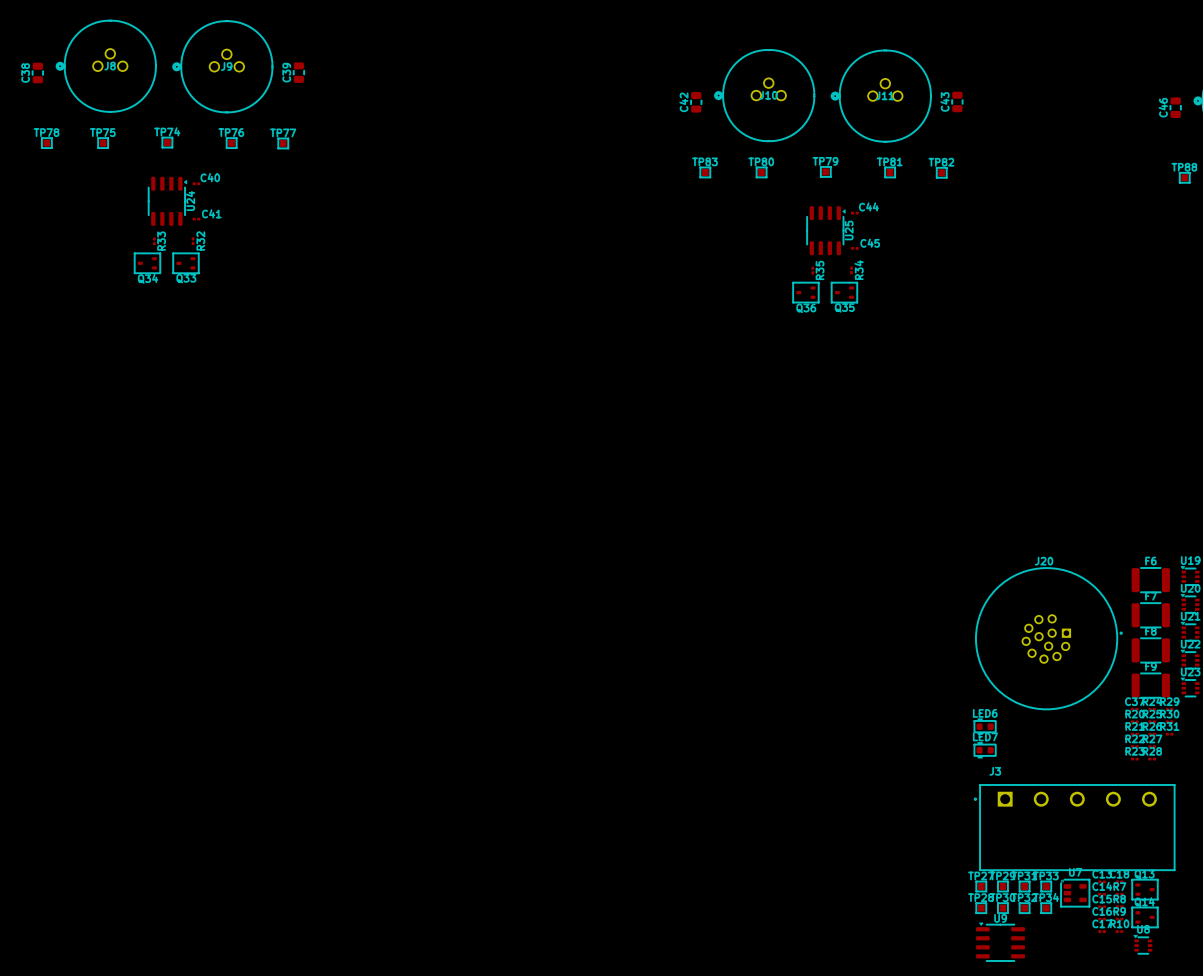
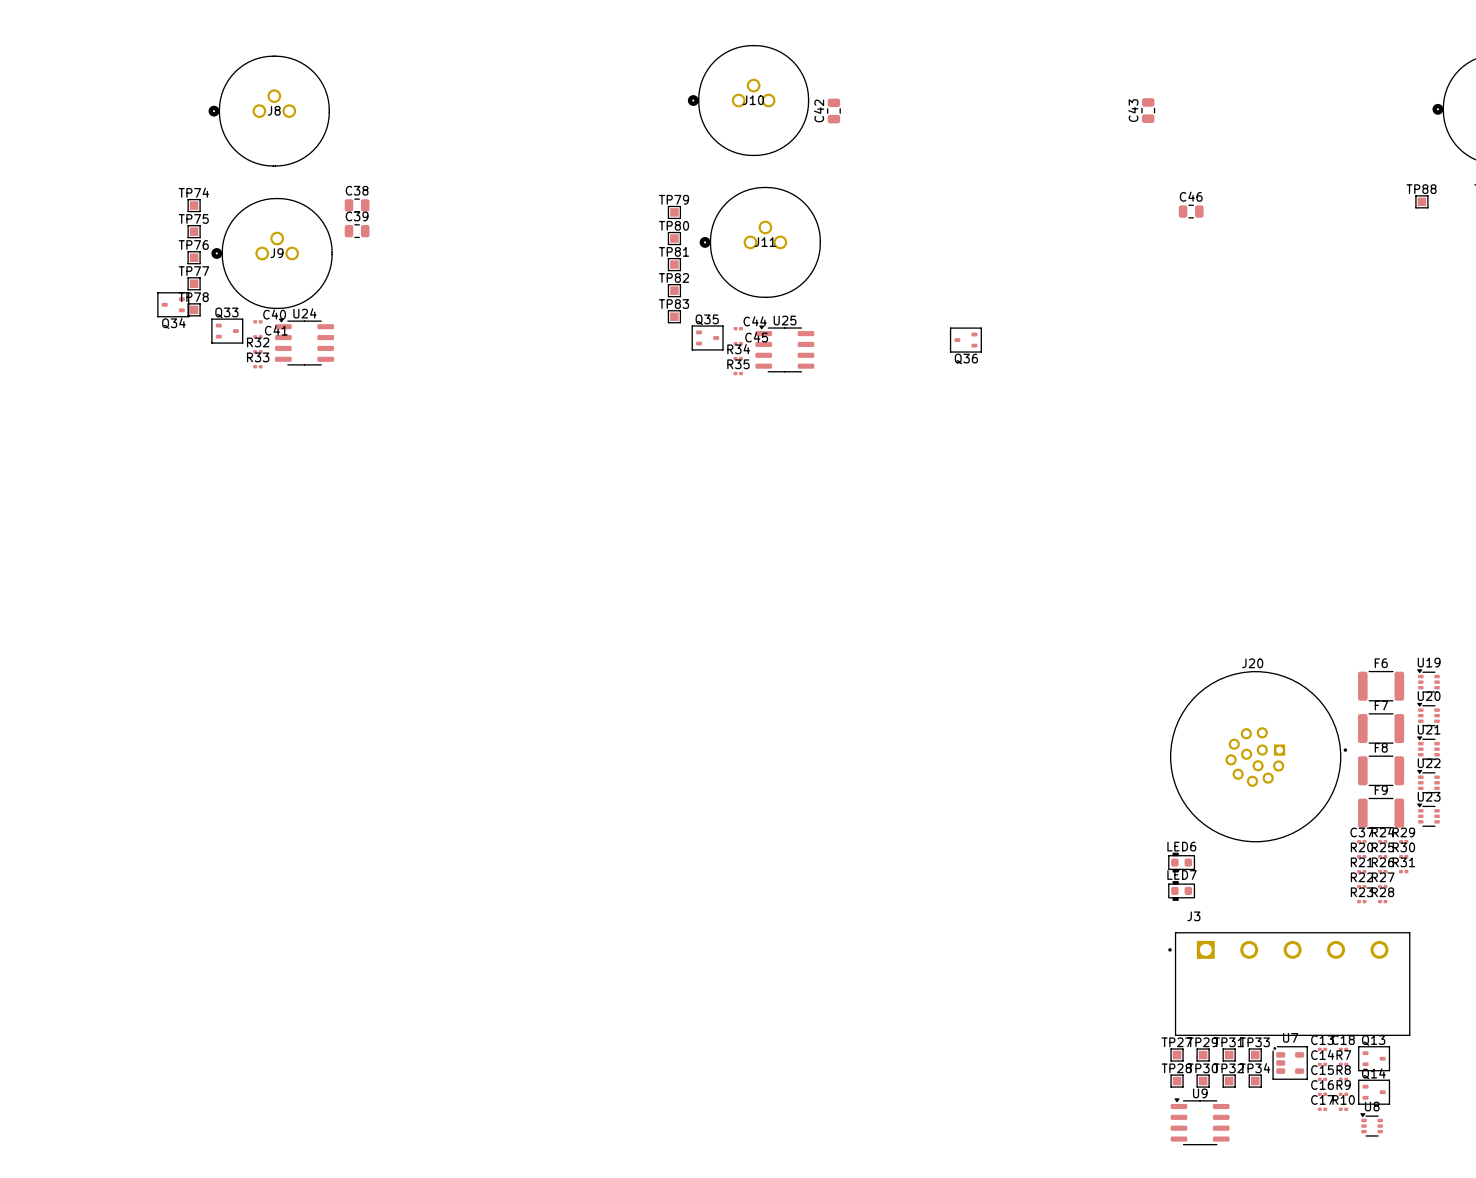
J8 position: (106, 66) -> (269, 111)
J9 position: (222, 66) -> (272, 253)
C39 rotation: 0° (298, 72) -> 90° clockwise (357, 231)
C39 position: (298, 72) -> (357, 231)
C38 rotation: 0° (37, 73) -> 90° clockwise (357, 205)
C38 position: (37, 73) -> (357, 205)
J10 position: (764, 95) -> (748, 100)
J11 position: (881, 96) -> (760, 242)
C46 rotation: 0° (1175, 107) -> 90° clockwise (1191, 211)
C46 position: (1175, 107) -> (1191, 211)
TP74 position: (167, 142) -> (194, 205)
TP78 position: (46, 143) -> (194, 309)
TP75 position: (103, 143) -> (194, 231)
TP76 position: (231, 143) -> (194, 257)
TP77 position: (283, 143) -> (194, 283)
TP79 position: (825, 171) -> (674, 212)
TP83 position: (705, 172) -> (674, 316)
TP80 position: (761, 172) -> (674, 238)
TP81 position: (890, 172) -> (674, 264)
TP82 position: (941, 172) -> (674, 290)
C40 position: (196, 183) -> (257, 321)
U24 rotation: 0° (167, 201) -> 90° counterclockwise (304, 342)
U24 position: (167, 201) -> (304, 342)
C44 position: (854, 213) -> (738, 328)
C41 position: (196, 219) -> (257, 336)
U25 rotation: 0° (826, 230) -> 90° counterclockwise (784, 348)
U25 position: (826, 230) -> (784, 348)
R33 rotation: 0° (154, 241) -> 90° clockwise (257, 366)
R33 position: (154, 241) -> (257, 366)
R32 rotation: 0° (193, 241) -> 90° clockwise (257, 351)
R32 position: (193, 241) -> (257, 351)
C45 position: (854, 248) -> (738, 343)
Q33 rotation: 0° (185, 263) -> 180° (227, 331)
Q33 position: (185, 263) -> (227, 331)
R35 rotation: 0° (812, 270) -> 90° clockwise (738, 373)
R35 position: (812, 270) -> (738, 373)
R34 rotation: 0° (851, 270) -> 90° clockwise (738, 358)
R34 position: (851, 270) -> (738, 358)
Q35 rotation: 0° (844, 292) -> 180° (707, 337)
Q35 position: (844, 292) -> (707, 337)

